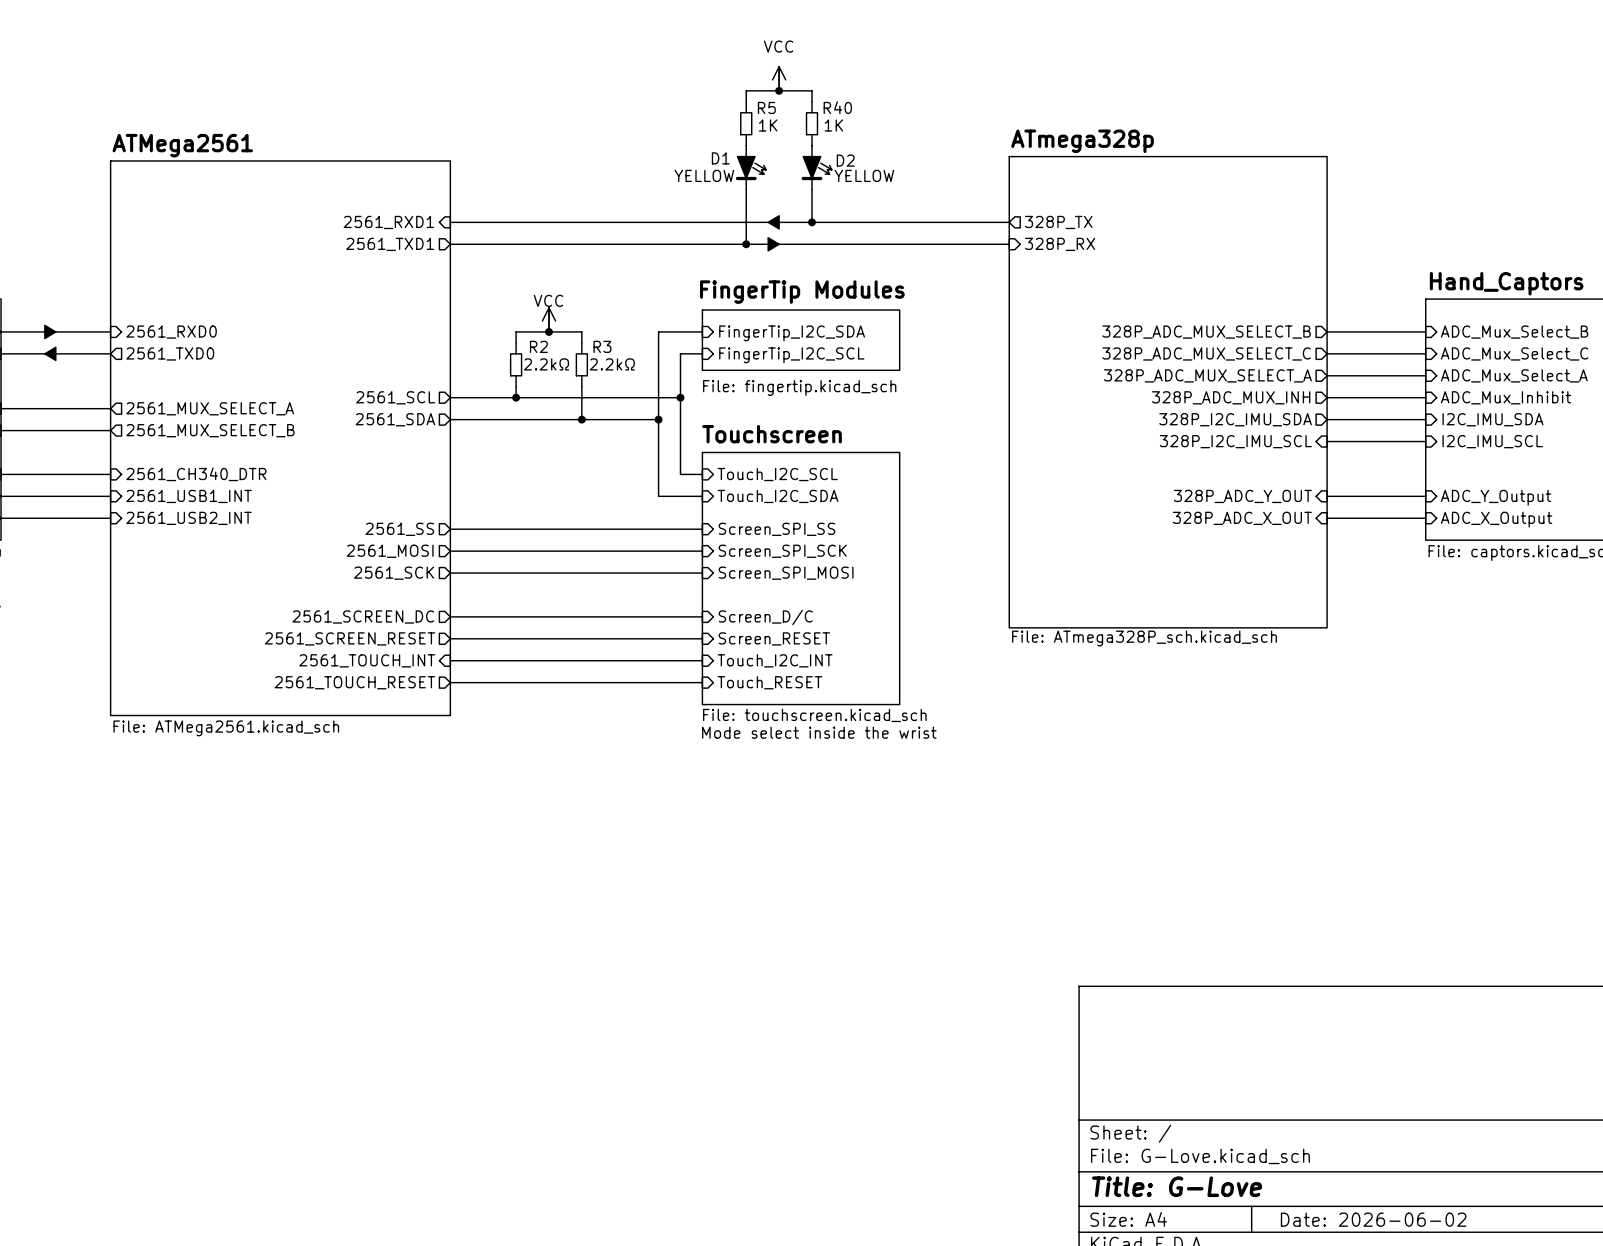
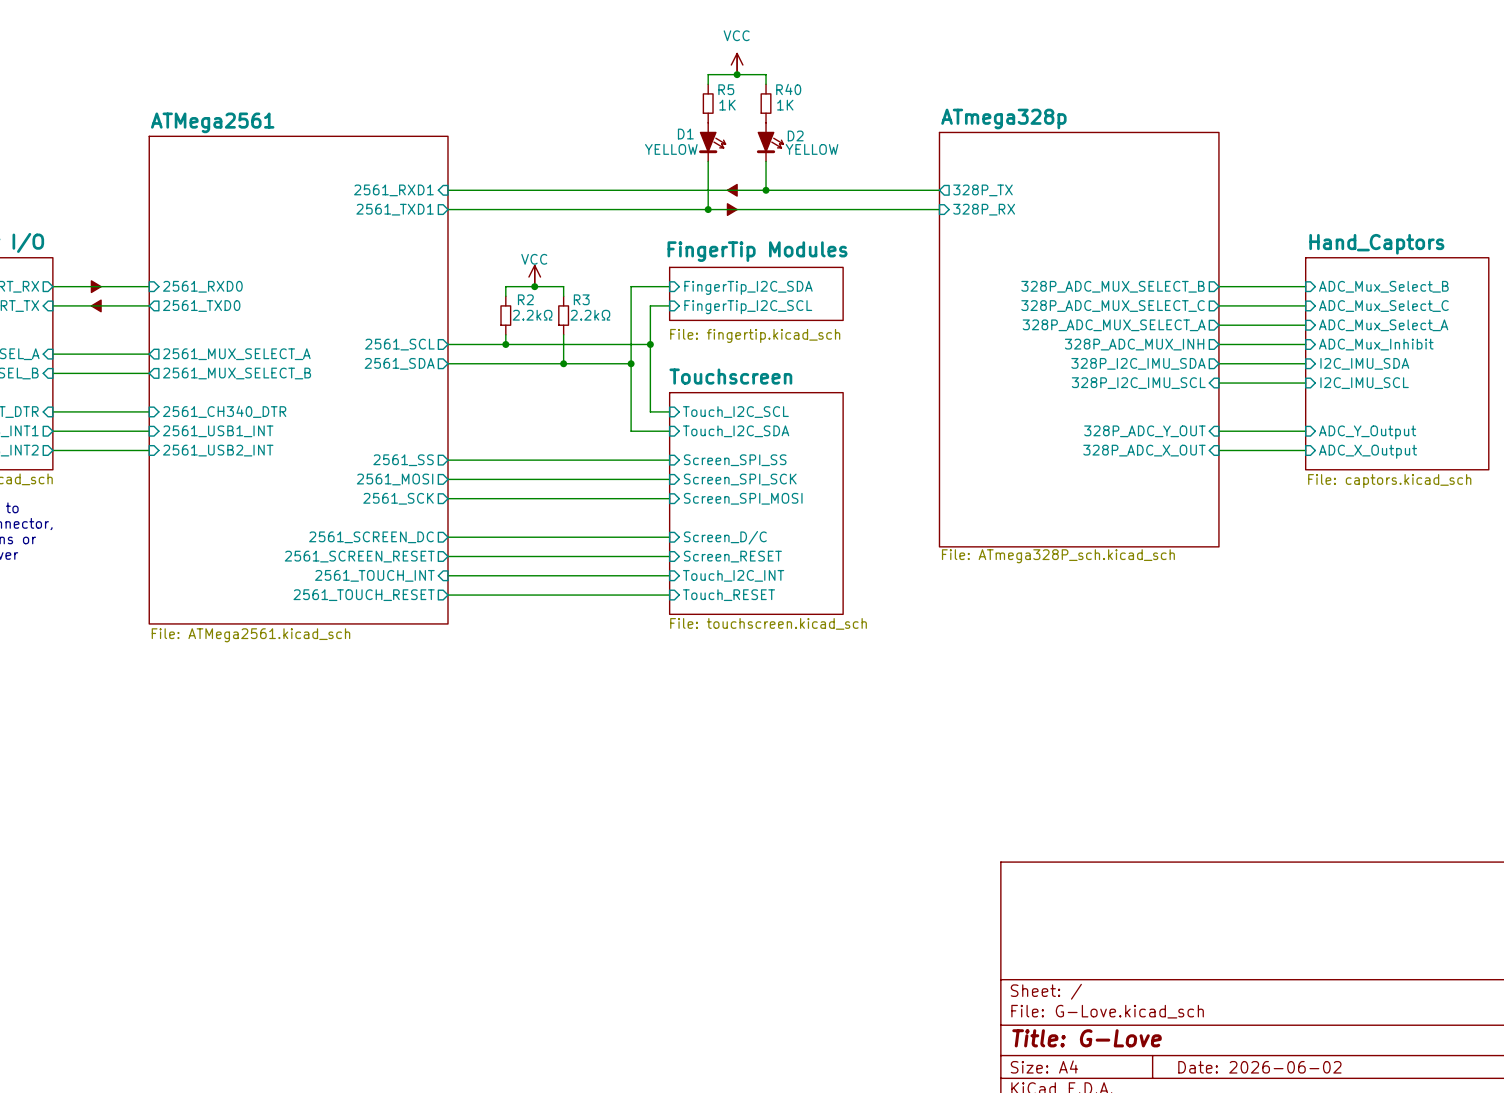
text: Mode select inside the wrist (819, 732) -> none

